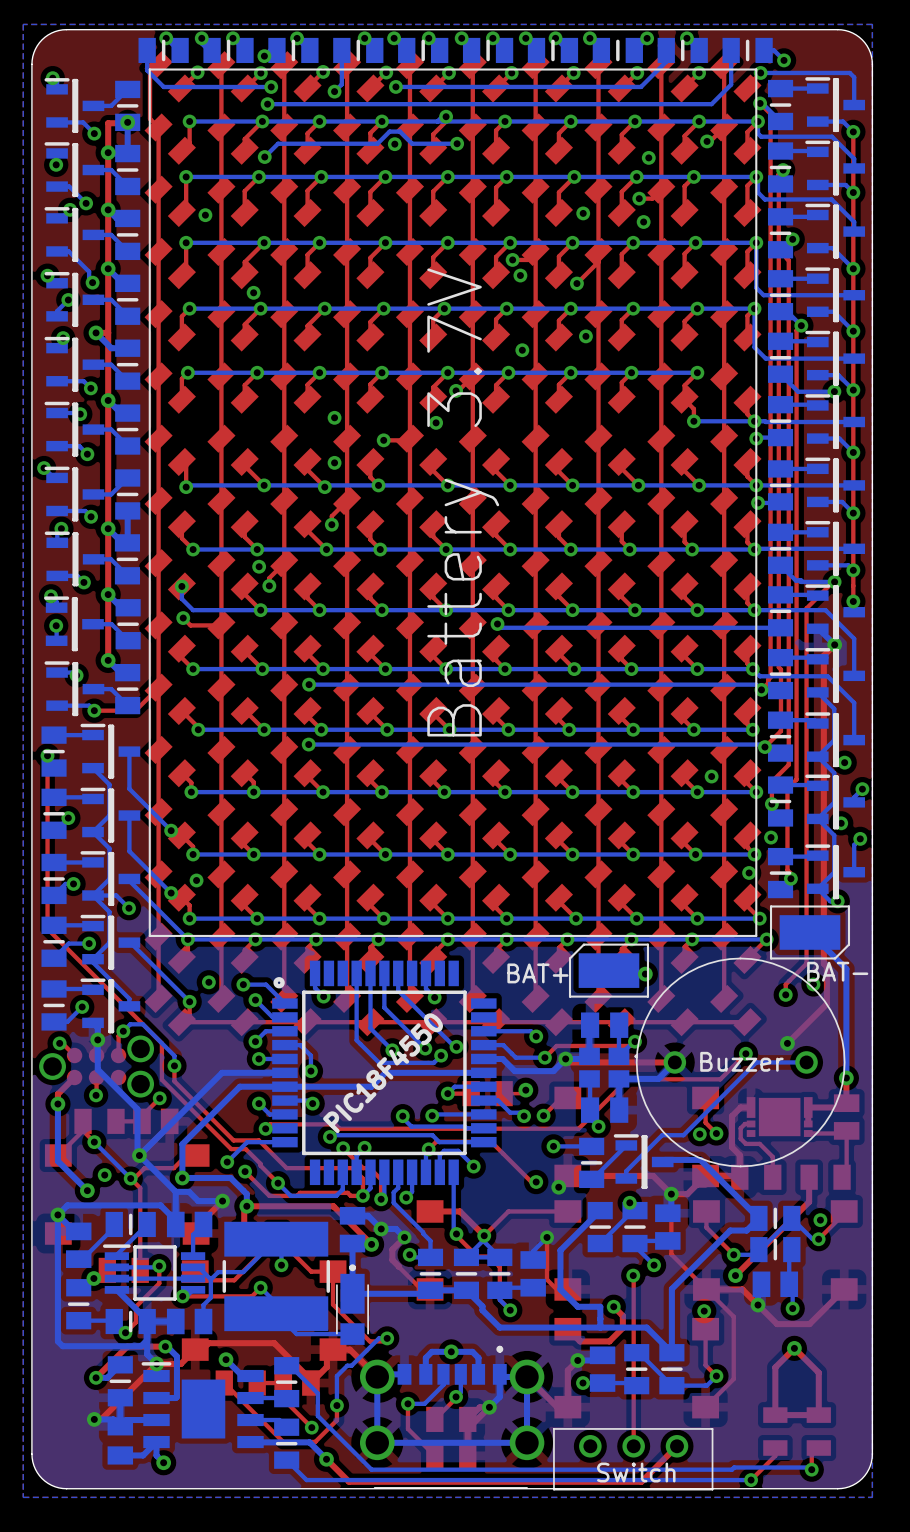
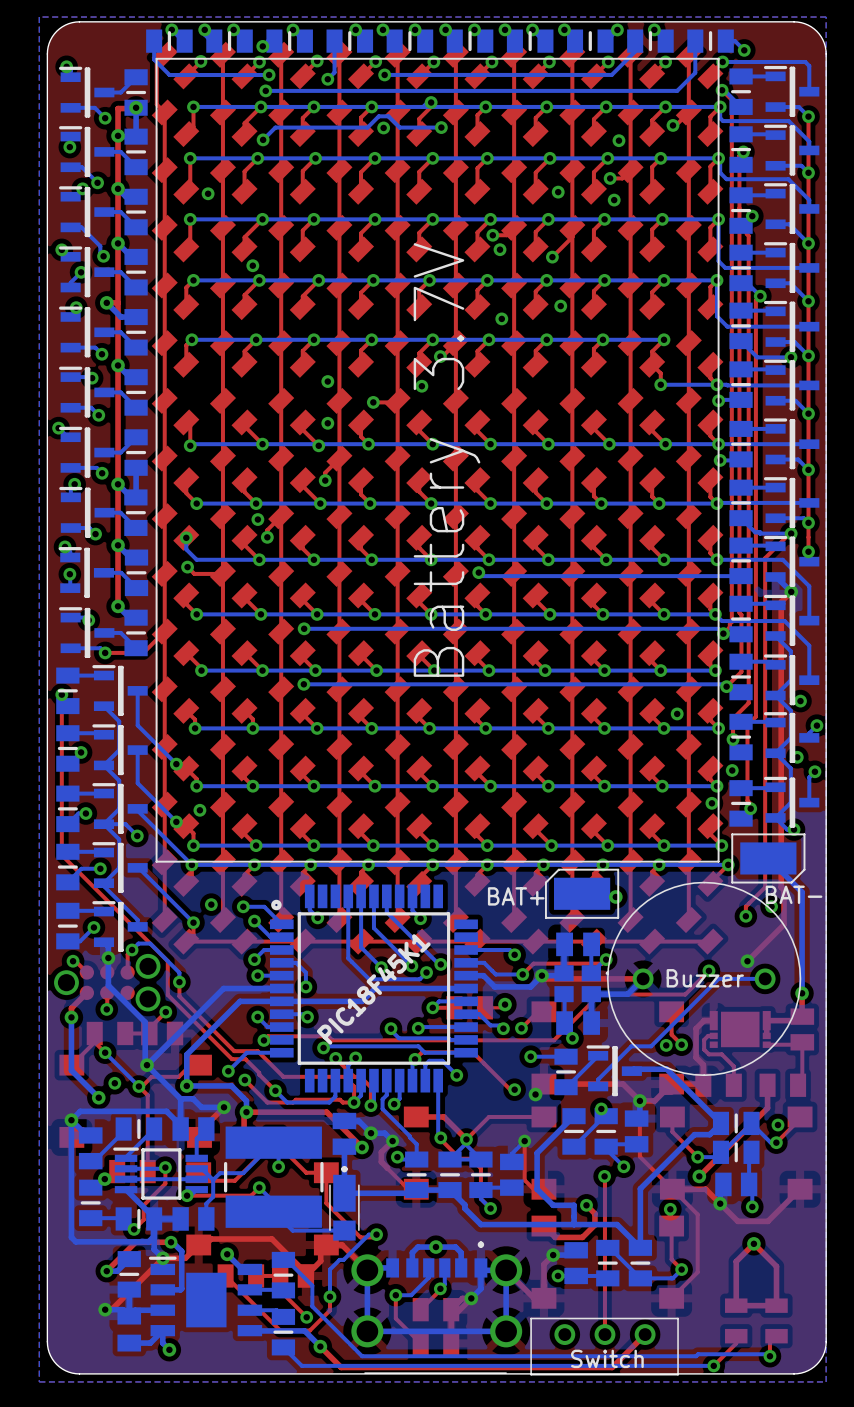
PIC18F4550 name: PIC18F4550 (383, 1073) -> PIC18F45K1 (373, 989)

